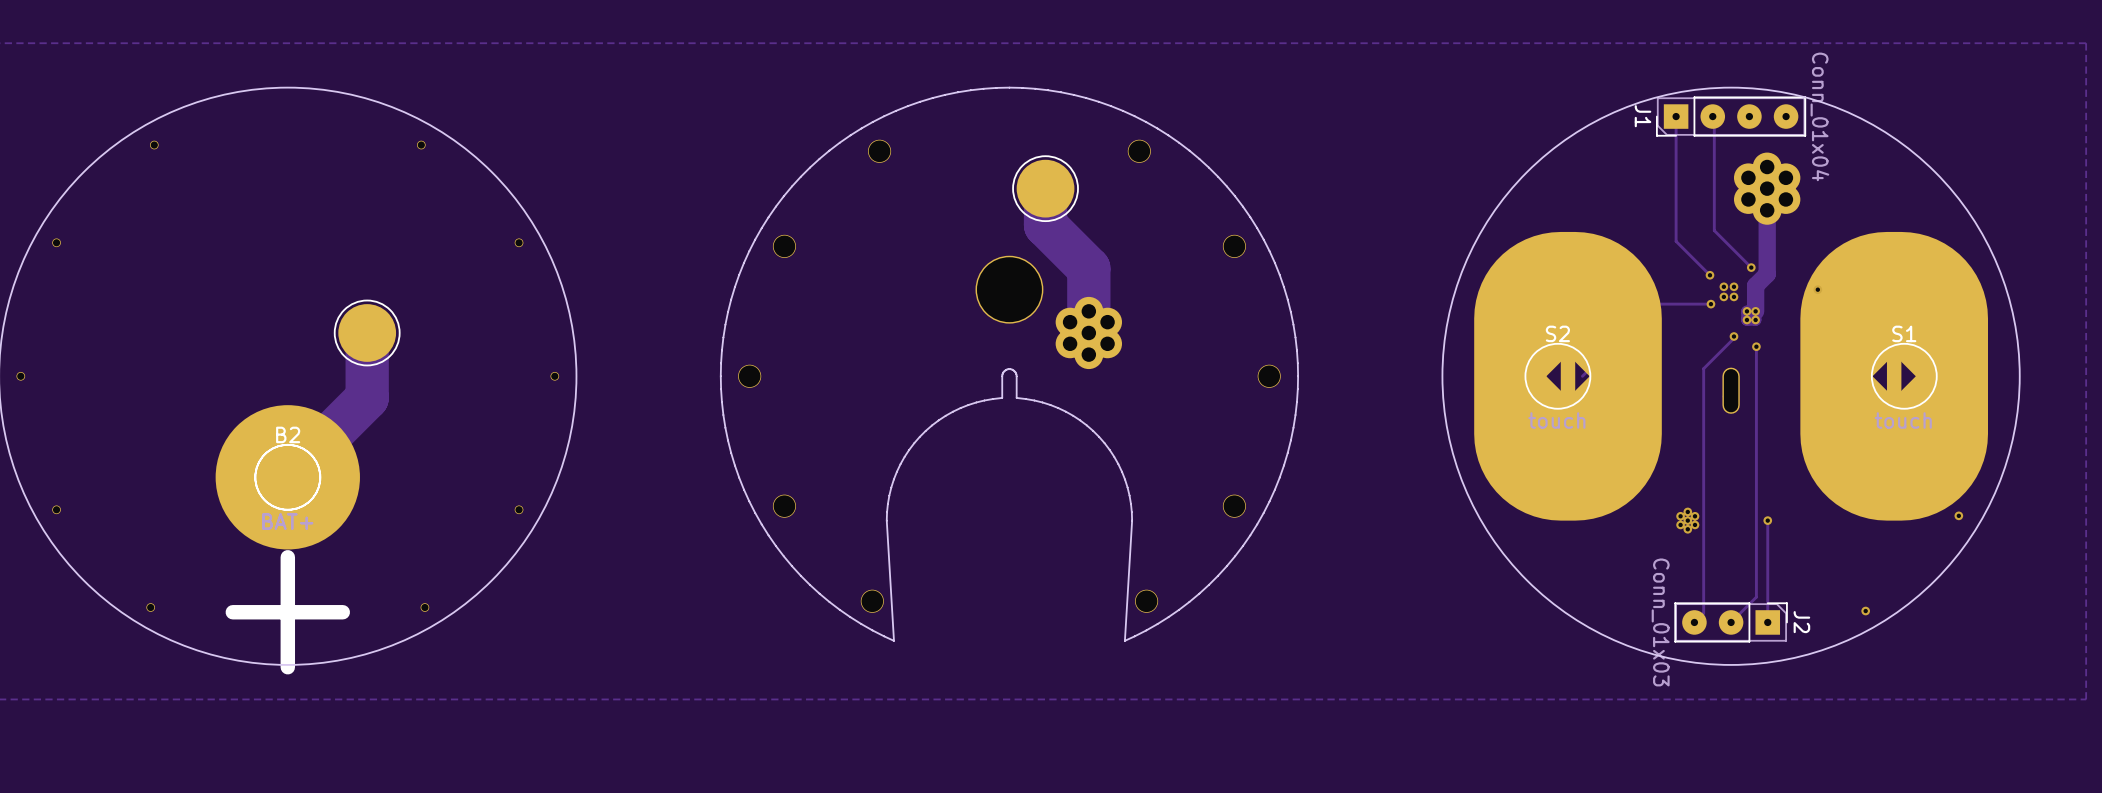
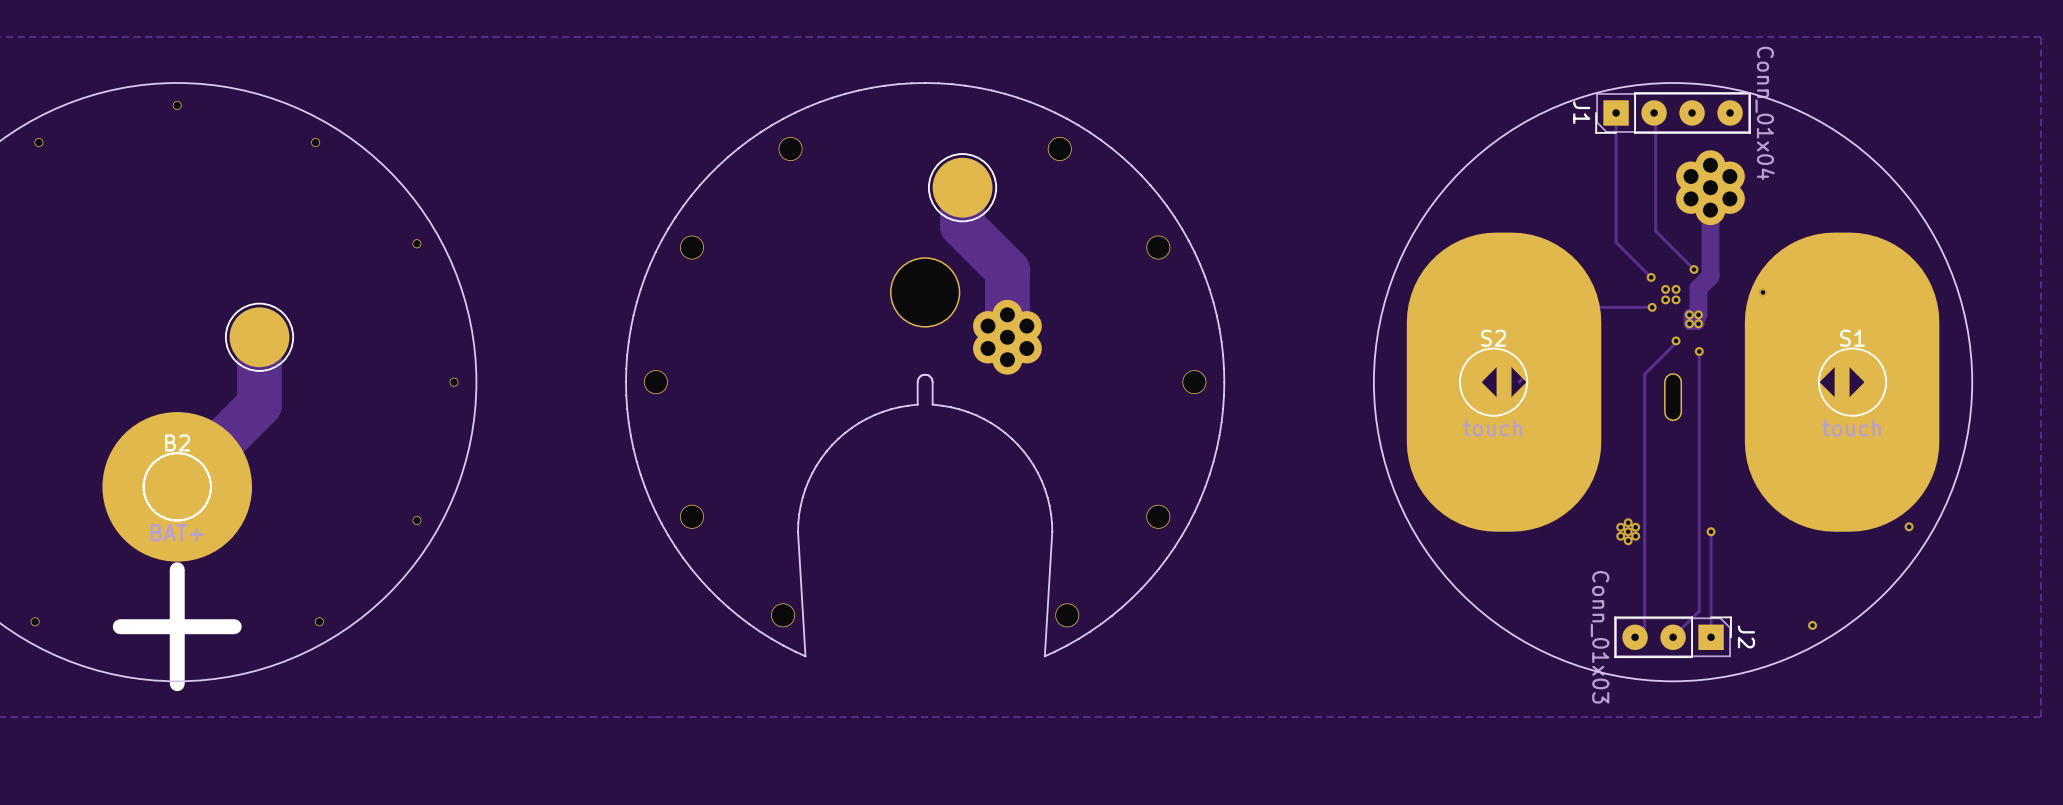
part: none -> (177, 105)

